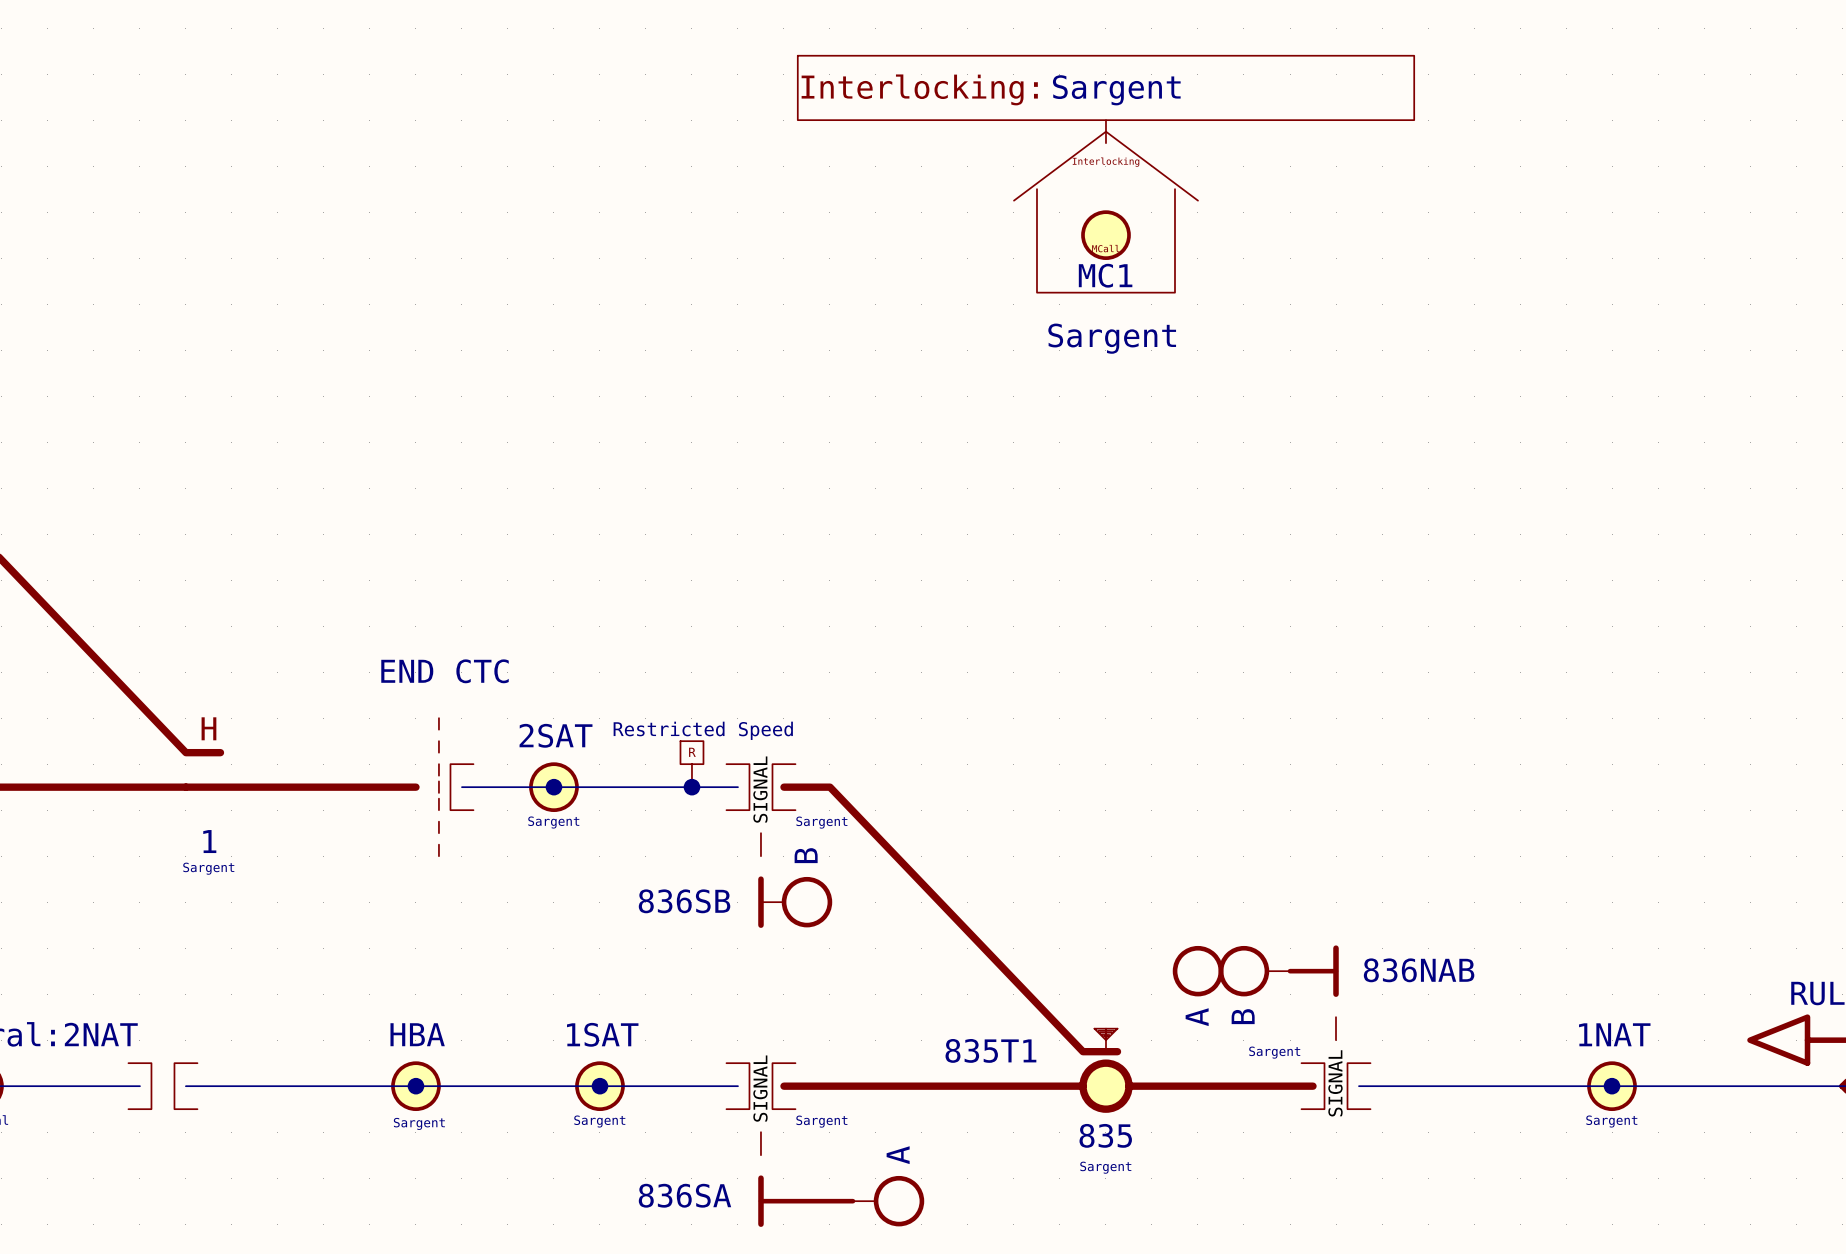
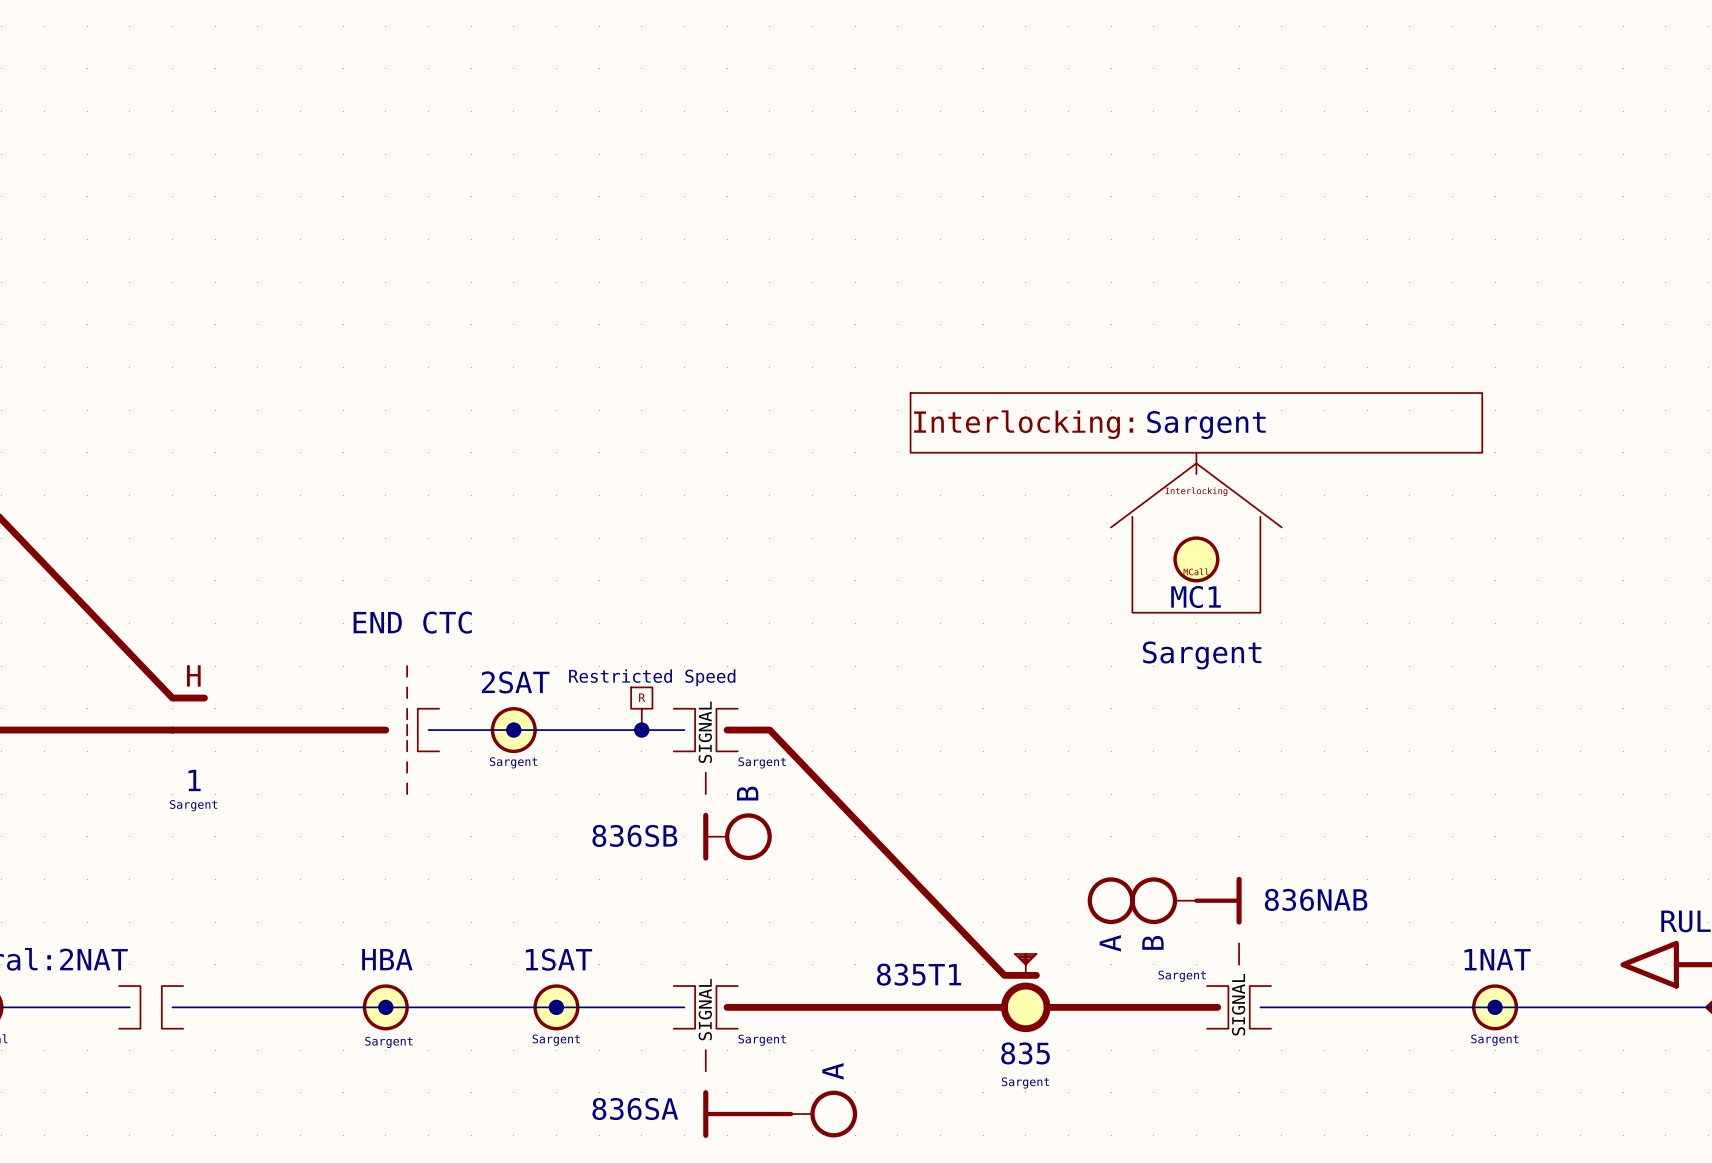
part position: (1105, 99) -> (1196, 433)
part position: (1105, 212) -> (1196, 538)
part position: (1105, 235) -> (1196, 559)

